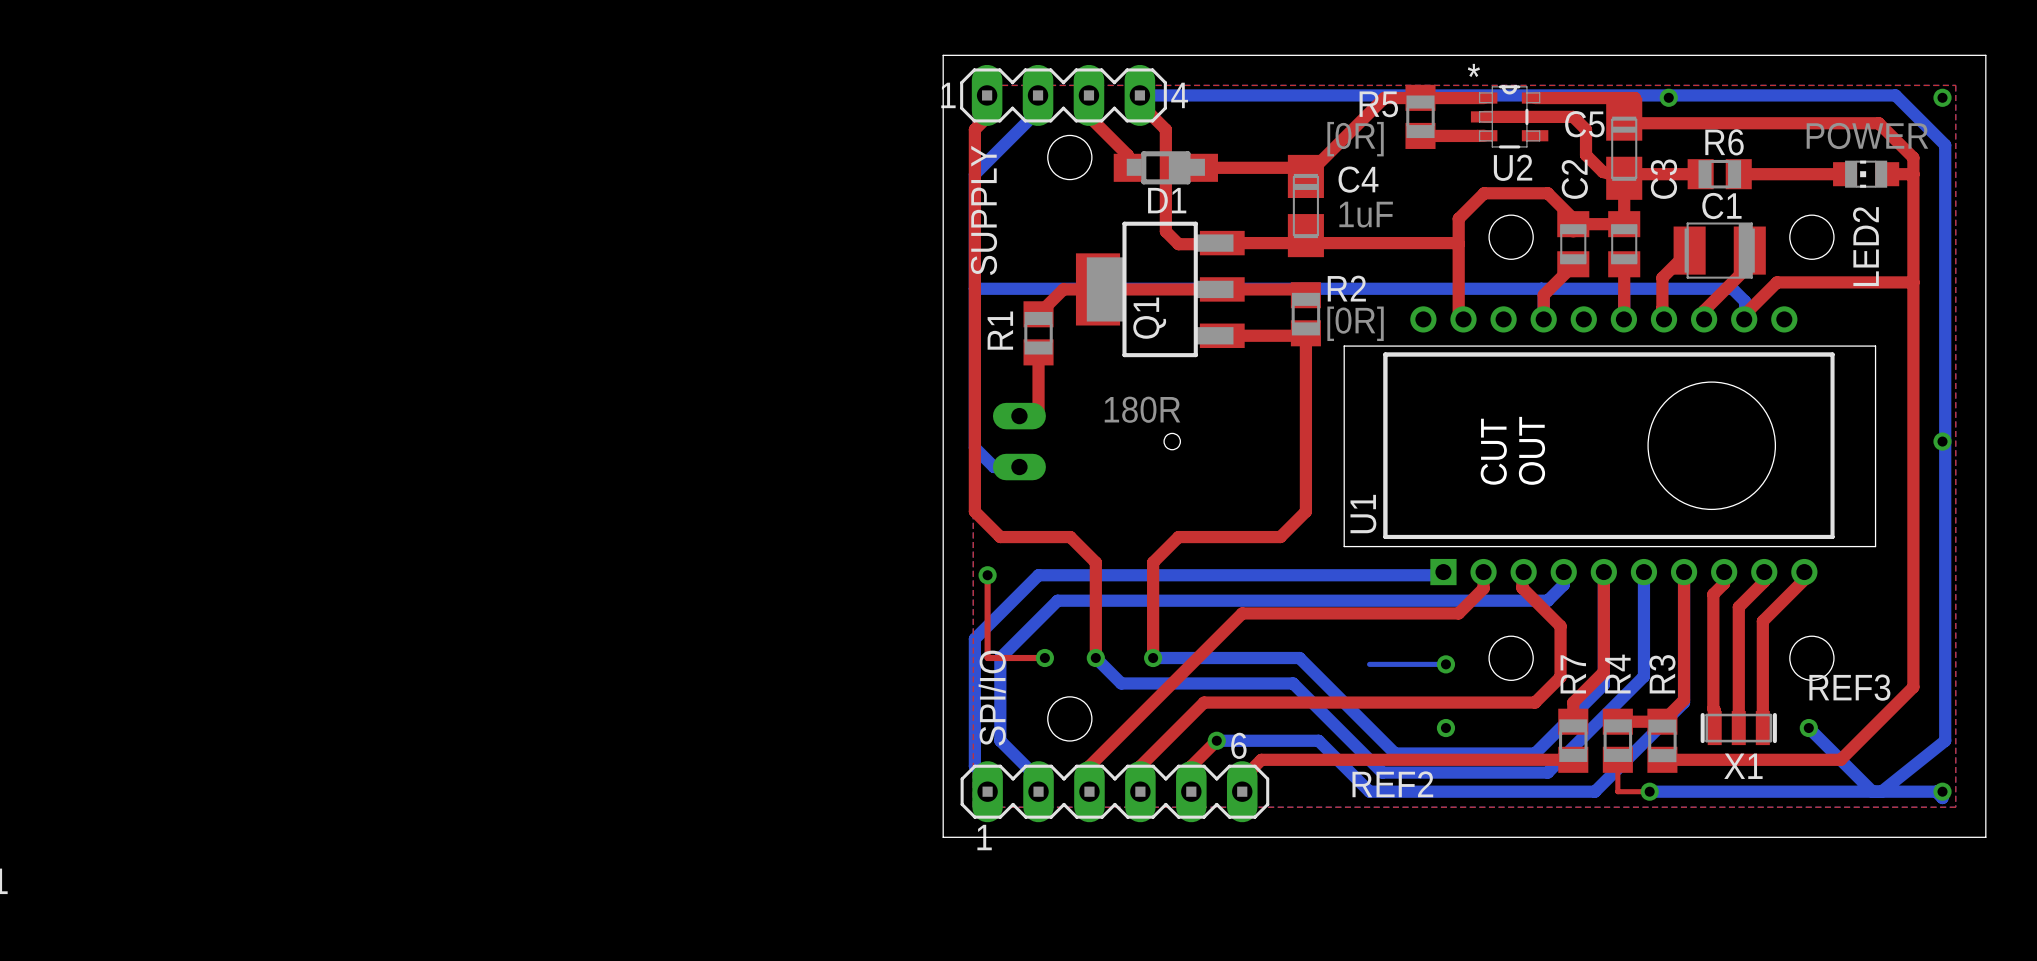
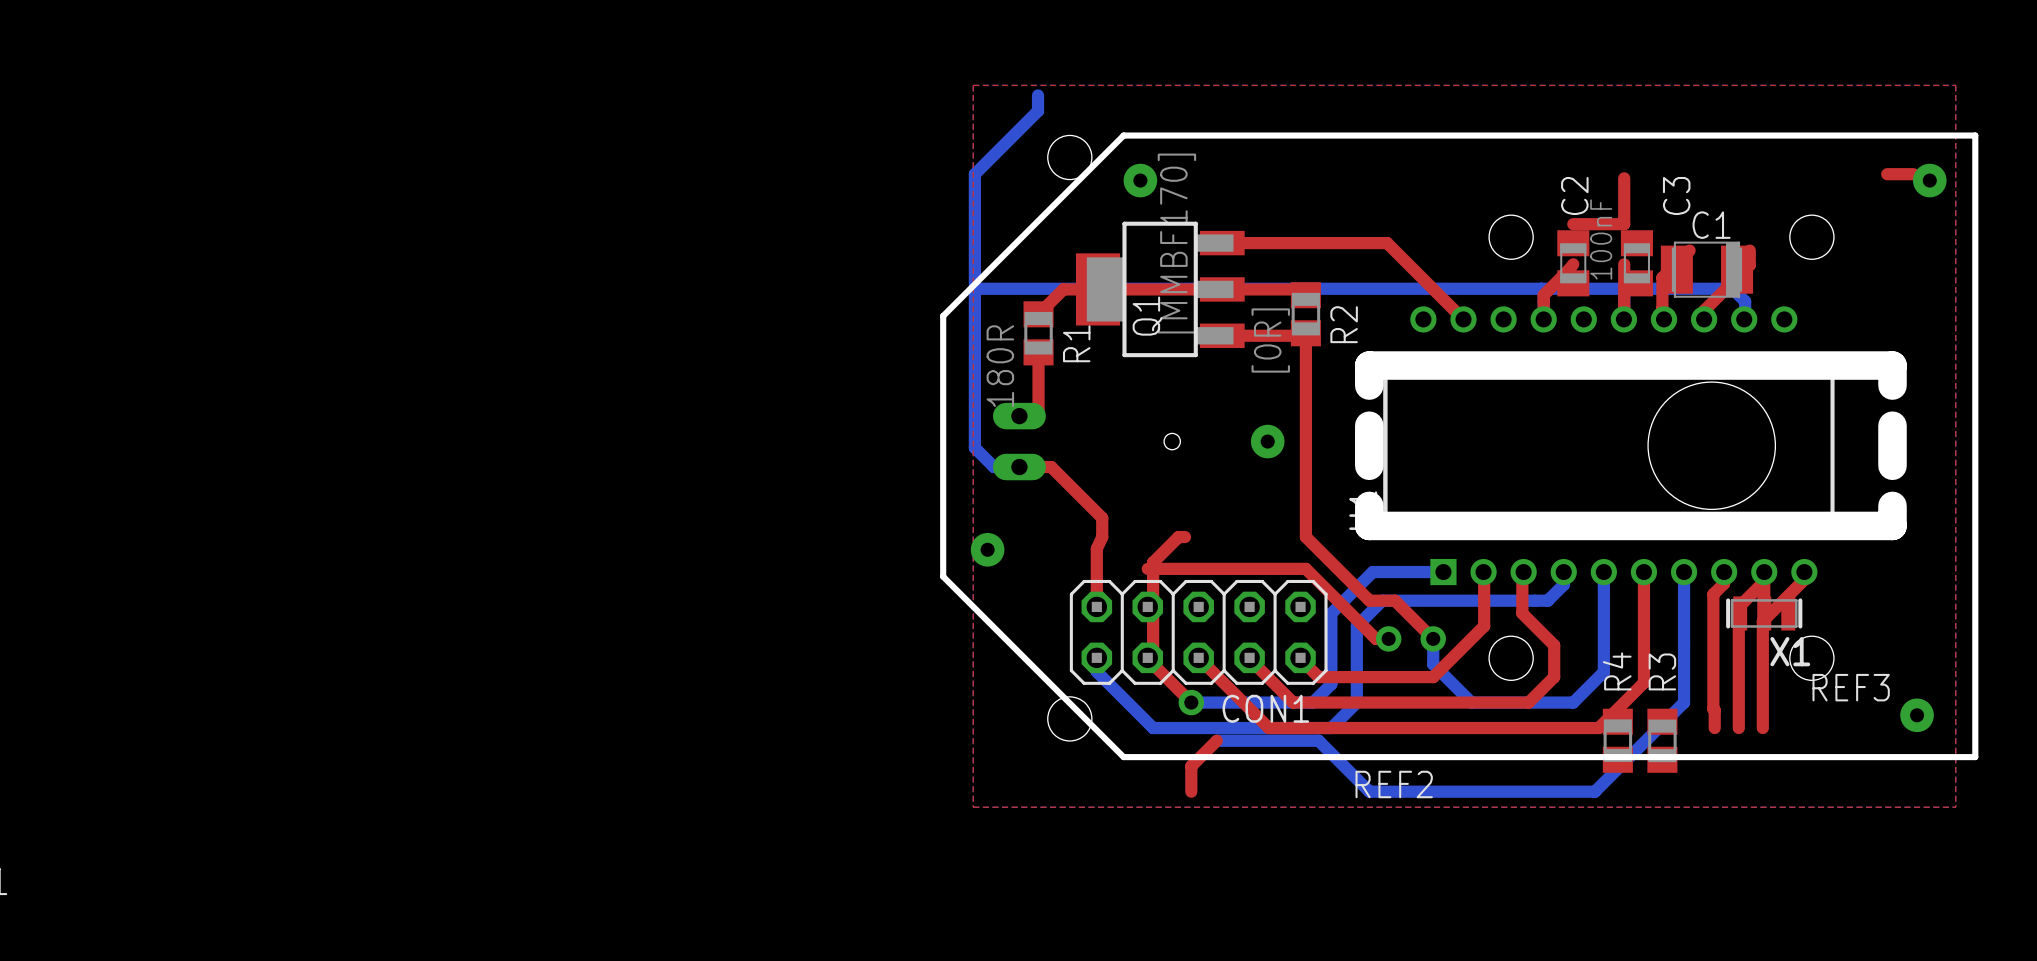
top track: (987, 95) (987, 116) (974, 129) (974, 511) (1000, 537) (1070, 537) (1095, 562) (1095, 658) -> none
SUPPLY: (1063, 95) -> none
top track: (1088, 95) (1089, 116) (1127, 155) (1127, 167) -> none
top track: (1139, 95) (1139, 103) (1165, 129) (1165, 231) (1178, 244) (1222, 243) -> none
bottom track: (1139, 95) (1895, 95) (1945, 145) (1945, 740) (1881, 791) -> none
via: (1668, 97) -> none
via: (1942, 97) -> none
top track: (1484, 98) (1384, 98) (1305, 176) (1303, 170) (1298, 167) (1203, 167) -> none
top track: (1535, 98) (1634, 98) (1624, 119) (1626, 112) (1636, 123) (1878, 123) (1913, 157) (1913, 687) (1840, 759) (1662, 759) -> none
R5: [0R] (1420, 116) -> none
top track: (1484, 116) (1573, 116) (1586, 129) (1586, 155) (1602, 171) (1624, 178) (1626, 174) (1700, 174) -> none
U2: (1509, 116) -> none
top track: (1484, 135) (1420, 135) -> none
C5: (1624, 148) -> none
D1: (1165, 167) -> none
R6: (1719, 174) -> none
top track: (1738, 174) (1845, 174) -> none
LED2: POWER (1866, 174) -> none
via: none -> (1140, 180)
via: none -> (1929, 180)
C4: 1uF (1305, 206) -> none
top track: (1573, 231) (1573, 218) (1547, 193) (1484, 193) (1458, 218) (1458, 314) -> none
top track: (1387, 243) (1458, 244) -> (1387, 243) (1458, 314)
C2 position: (1573, 244) -> (1573, 263)
C3 position: (1624, 244) -> (1636, 263)
C2 value: none -> 100nF (1601, 239)
C1 position: (1719, 250) -> (1706, 269)
Q1 value: none -> [MMBF170] (1176, 243)
top track: (1913, 282) (1777, 282) (1744, 315) (1744, 319) -> none
R2 name rotation: 0° (1346, 288) -> 90° counterclockwise (1344, 324)
board edge: (943, 315) (943, 55) (1985, 55) (1985, 837) (943, 837) (943, 576) -> (943, 315) (1123, 135) (1975, 135) (1975, 757) (1123, 757) (943, 576)
board edge width: thin (943, 315) (943, 576) -> thick (943, 315) (943, 576)
R2 value rotation: 0° (1355, 323) -> 90° counterclockwise (1270, 340)
R2 value position: [0R] (1355, 323) -> [0R] (1270, 340)
R1 name position: R1 (1000, 330) -> R1 (1076, 343)
board edge: (1344, 346) (1875, 346) (1875, 546) (1344, 546) (1344, 346) -> none
board edge: none -> (1369, 385) (1369, 365) (1892, 365) (1892, 385)
R1 value rotation: 0° (1142, 409) -> 90° counterclockwise (1000, 366)
R1 value position: 180R (1142, 409) -> 180R (1000, 366)
board edge: none -> (1369, 425) (1369, 465)
board edge: none -> (1892, 425) (1892, 465)
via: none -> (1267, 441)
via: (1942, 441) -> none
text: OUT (1531, 450) -> none
text: CUT (1493, 451) -> none
top track: none -> (1019, 467) (1051, 467) (1102, 518) (1102, 537) (1096, 548) (1096, 606)
board edge: none -> (1369, 505) (1369, 525) (1892, 525) (1892, 505)
top track: (1305, 511) (1280, 537) (1185, 537) -> (1305, 511) (1305, 537) (1369, 600) (1395, 600) (1433, 638)
via: none -> (987, 549)
top track: none -> (1147, 568) (1305, 568) (1375, 638) (1388, 638)
bottom track: (1443, 572) (1440, 575) (1038, 575) (974, 638) (974, 766) (987, 778) (987, 791) -> (1443, 572) (1372, 572) (1331, 613) (1331, 684) (1312, 702) (1191, 702)
top track: (1483, 572) (1483, 588) (1458, 613) (1242, 613) (1089, 766) (1089, 796) -> (1483, 572) (1484, 626) (1433, 677) (1318, 677) (1300, 658)
top track: (1603, 572) (1603, 672) (1573, 702) (1573, 721) -> none
top track: none -> (1643, 572) (1643, 682) (1598, 728) (1268, 728) (1198, 657)
bottom track: (1643, 572) (1643, 676) (1547, 772) (1382, 772) (1293, 683) (1121, 683) (1095, 658) -> none
top track: (1684, 572) (1684, 700) (1662, 721) (1617, 721) -> none
top track: (987, 575) (987, 658) (1044, 658) -> none
via: (987, 575) -> none
top track: (1522, 587) (1560, 626) (1560, 677) (1535, 702) (1528, 702) -> (1522, 587) (1522, 613) (1554, 645) (1554, 677) (1528, 702)
bottom track: (1382, 600) (1057, 600) (1000, 658) (1000, 740) (1038, 778) (1038, 796) -> (1382, 600) (1356, 626) (1356, 702) (1331, 728) (1153, 728) (1096, 671) (1096, 657)
CON1: none -> (1198, 632)
via: none -> (1388, 638)
via: none -> (1433, 638)
top track: none -> (1147, 657) (1191, 702)
via: (1044, 658) -> none
via: (1095, 658) -> none
bottom track: (1153, 658) (1299, 658) (1395, 753) (1535, 753) (1603, 684) (1603, 672) -> (1433, 638) (1433, 664) (1471, 702) (1573, 702) (1603, 672)
via: (1153, 658) -> none
bottom track: (1369, 664) (1445, 664) -> none
via: (1445, 664) -> none
via: none -> (1191, 702)
top track: (1293, 702) (1204, 702) (1140, 766) (1140, 804) -> (1293, 702) (1249, 657)
via: none -> (1917, 715)
via: (1445, 728) -> none
X1 position: (1738, 728) -> (1764, 613)
bottom track: (1808, 728) (1872, 791) -> none
via: (1808, 728) -> none
via: (1216, 740) -> none
R7: (1573, 740) -> none
top track: (1573, 759) (1261, 759) (1242, 778) (1242, 791) -> none
top track: (1617, 759) (1617, 791) (1649, 791) -> none
X1 name position: X1 (1743, 766) -> X1 (1790, 651)
SPI/IO: (1114, 791) -> none
bottom track: (1649, 791) (1942, 791) (1942, 798) (1936, 791) -> none
via: (1649, 791) -> none
via: (1942, 791) -> none

